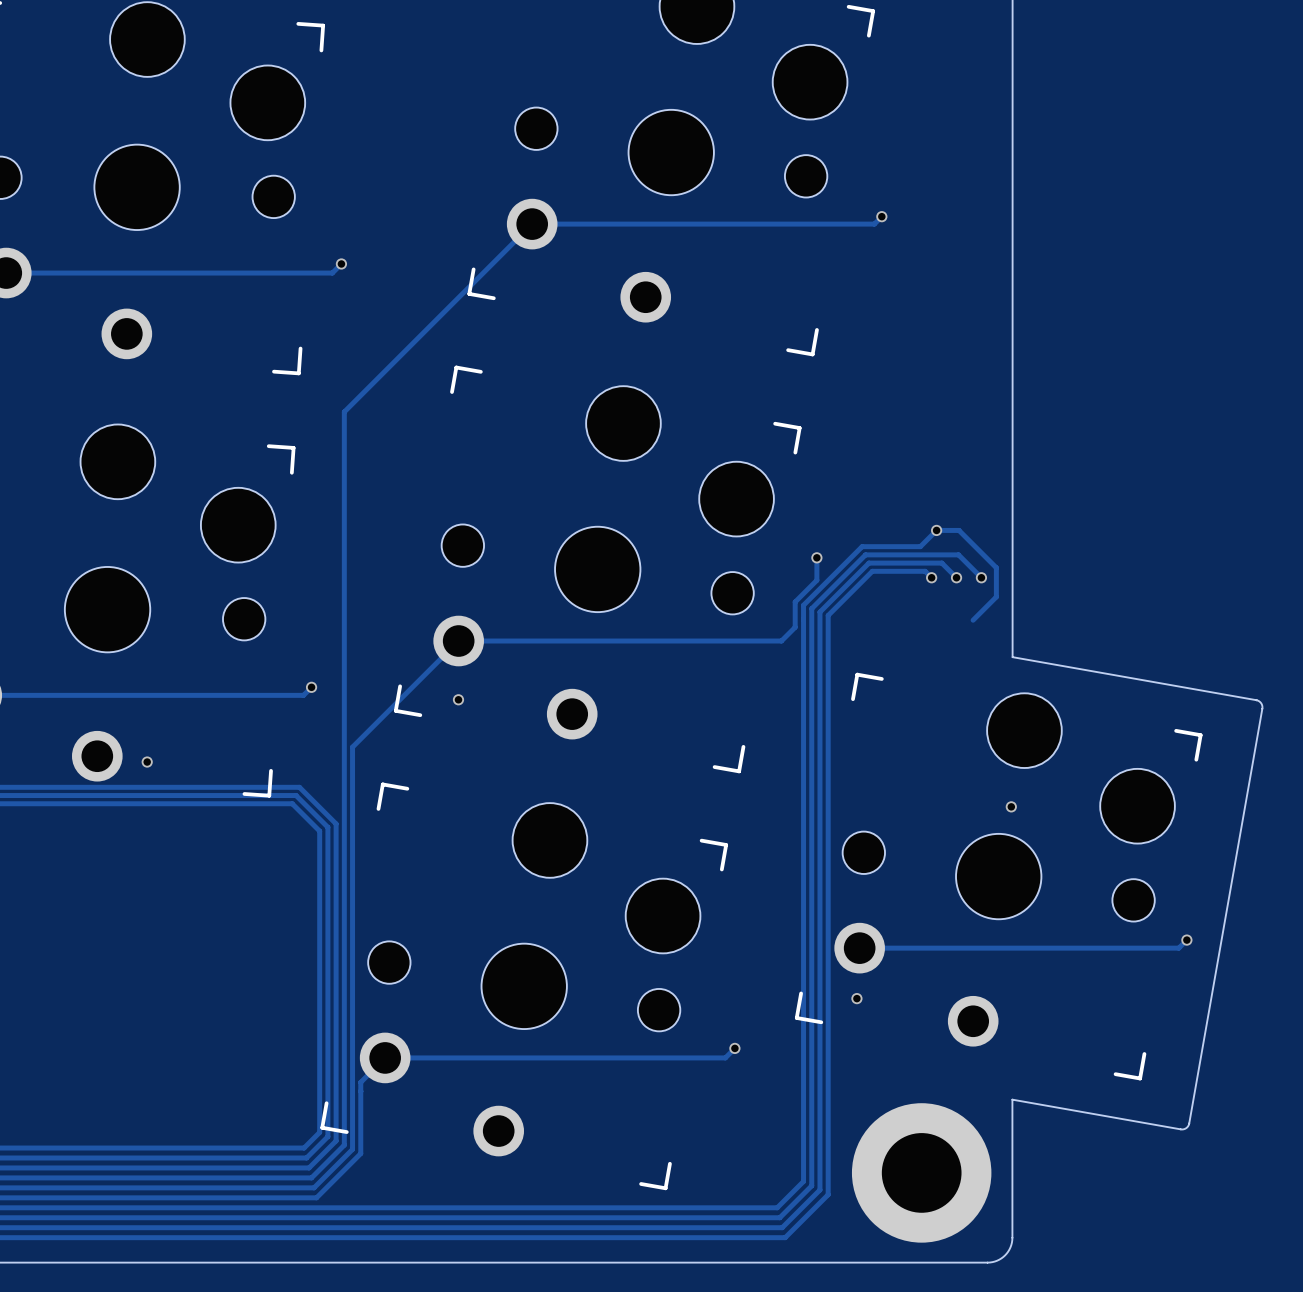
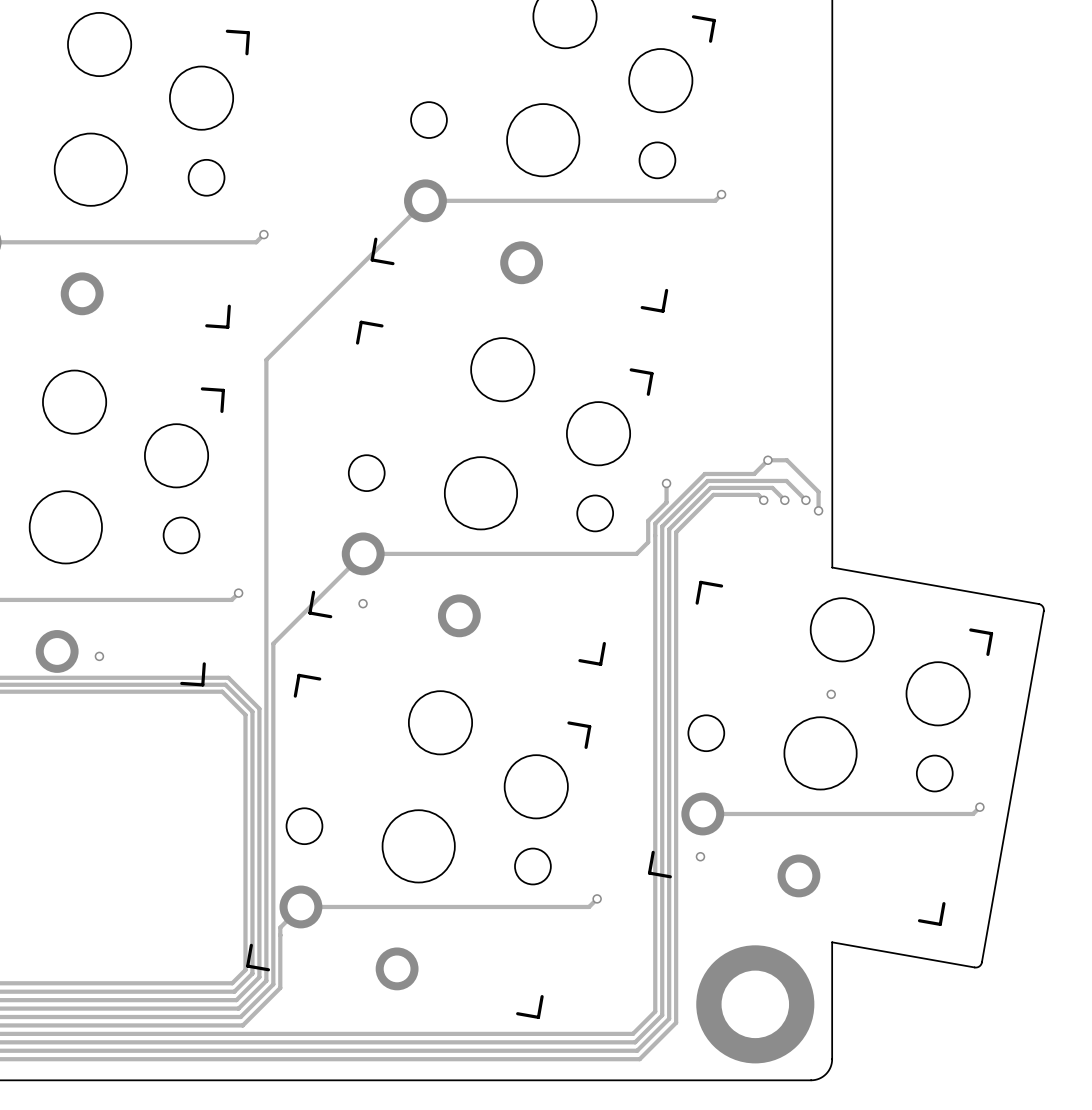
track: (996, 590) (996, 596) (973, 620) -> none
via: none -> (818, 510)

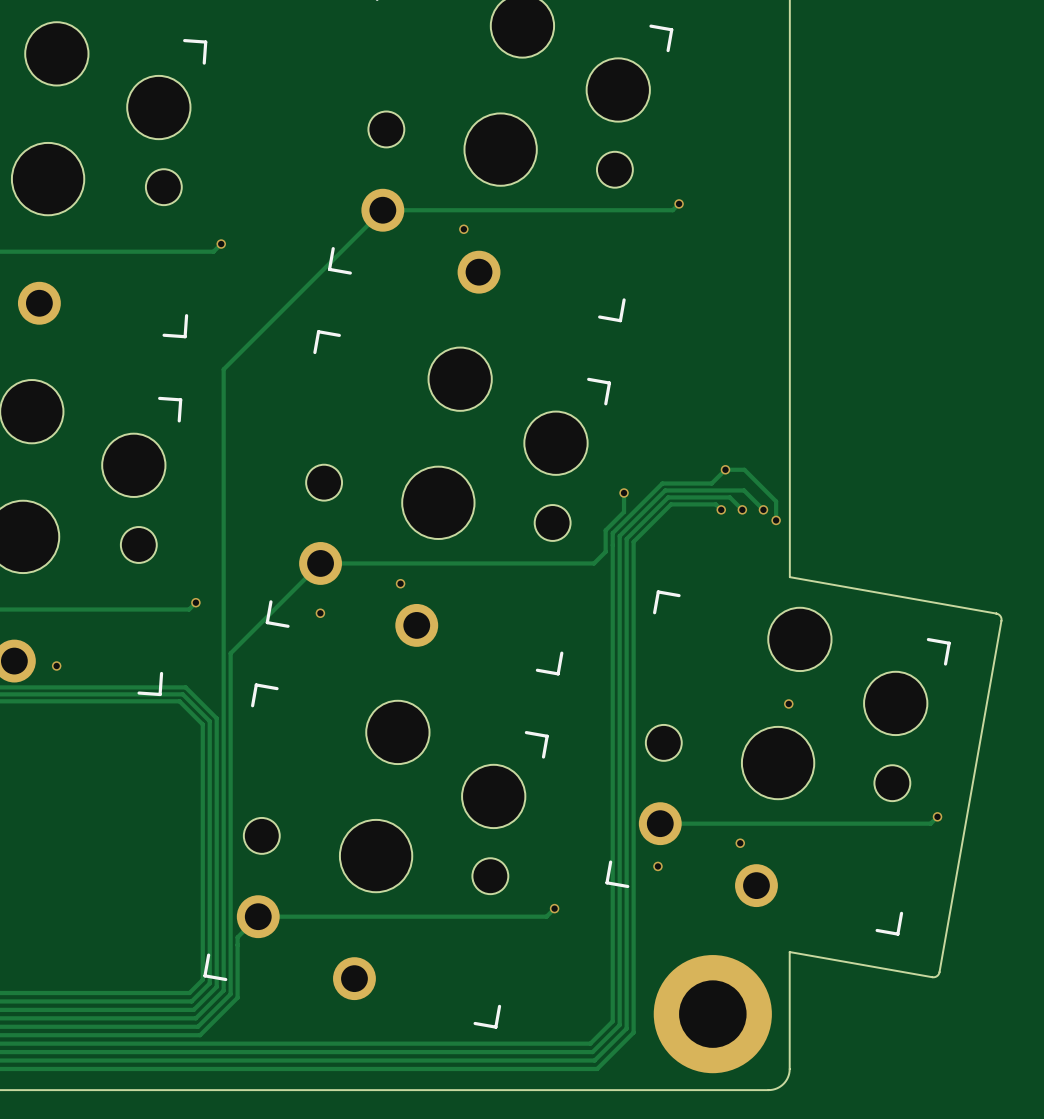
via: none -> (463, 229)
via: none -> (400, 583)
via: none -> (740, 843)

